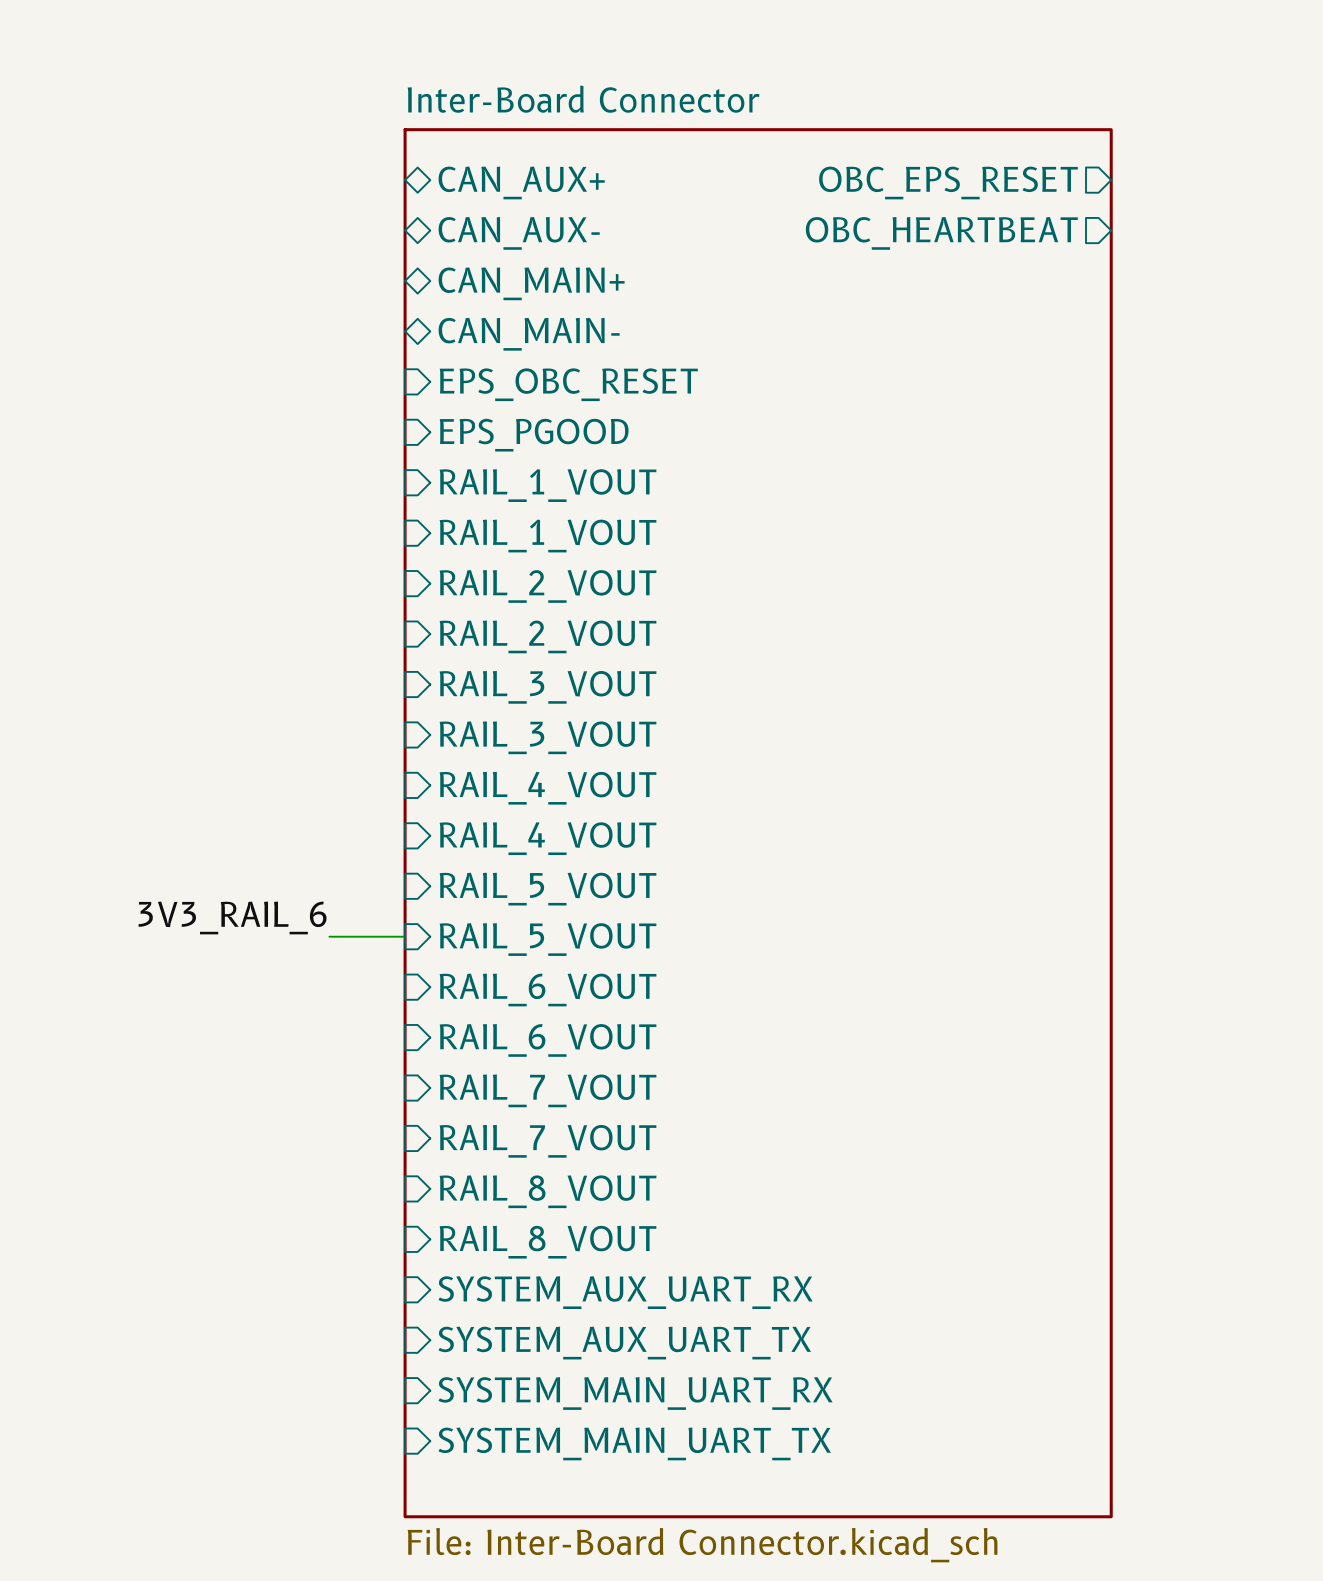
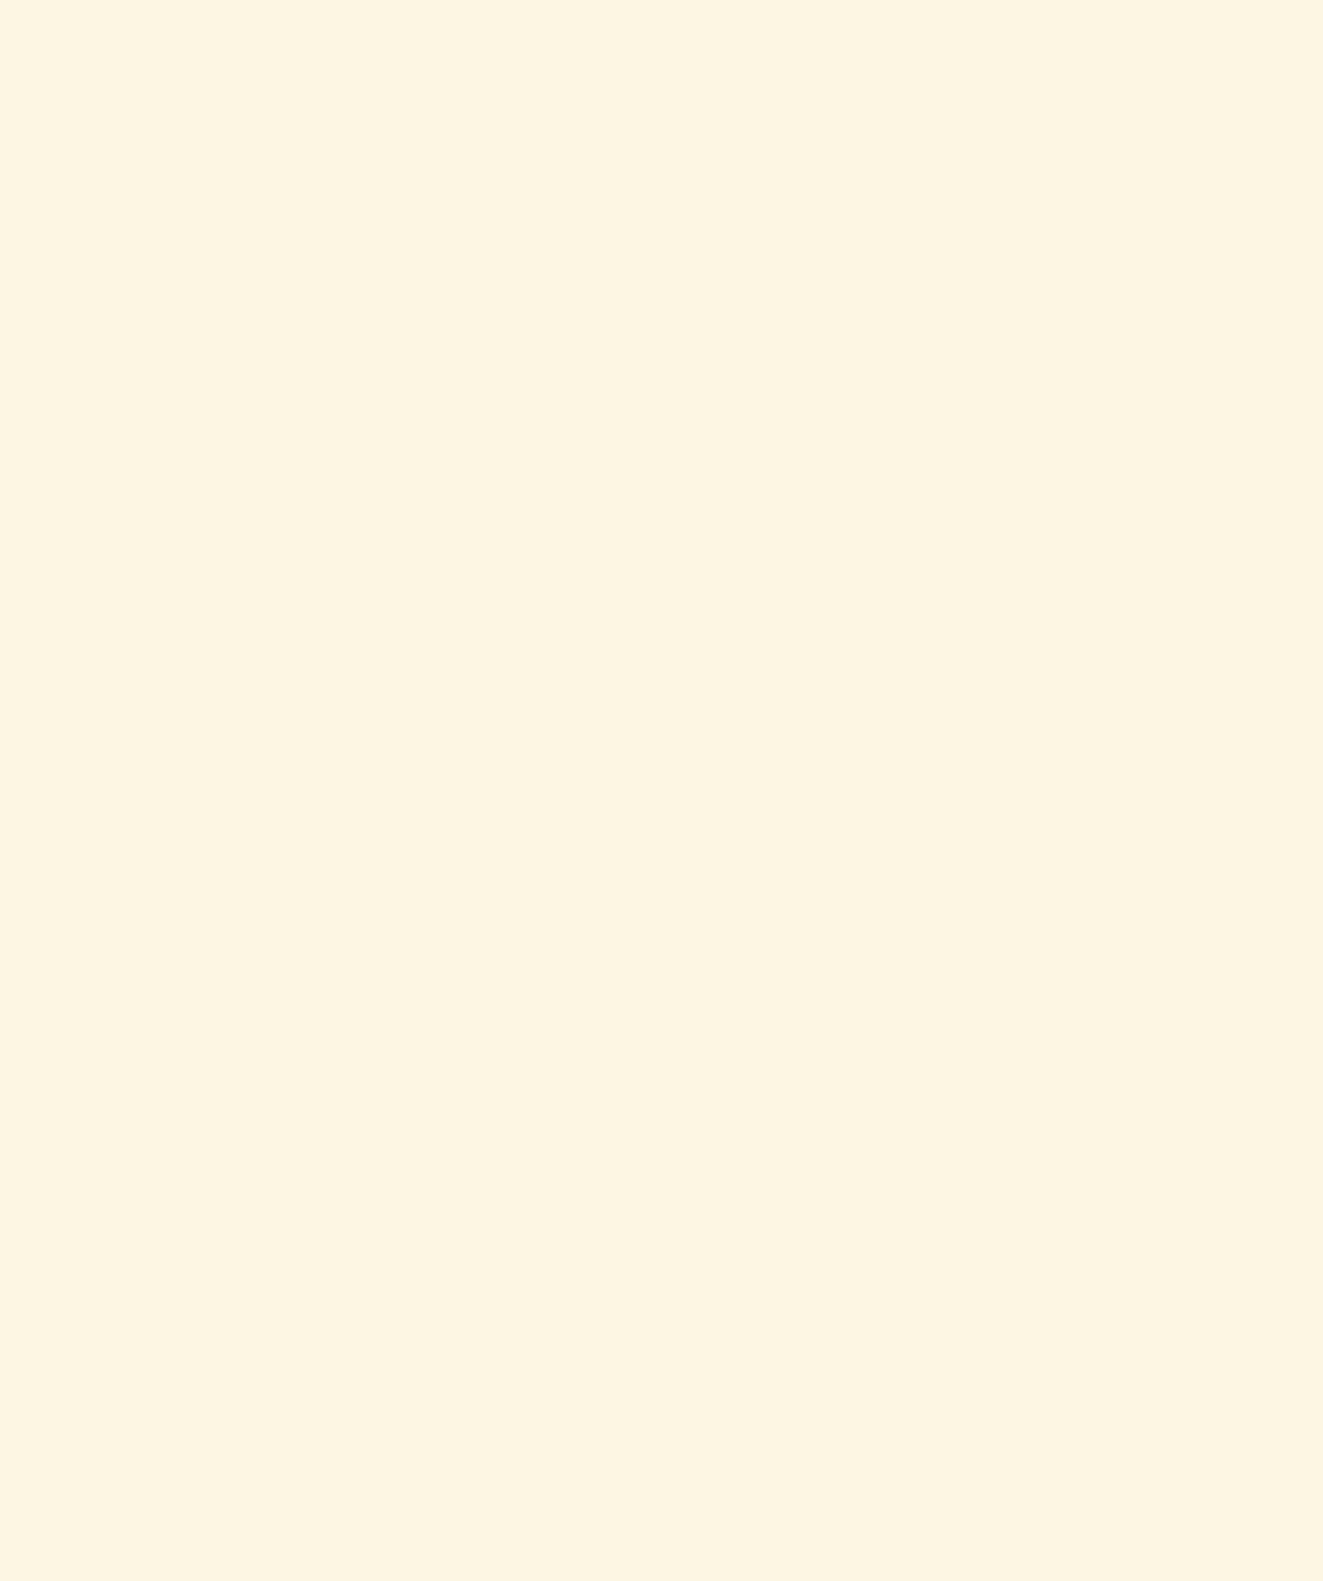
sheet pin: CAN_AUX+ (521, 182) -> none
sheet pin: OBC_EPS_RESET (948, 182) -> none
sheet pin: CAN_AUX- (519, 233) -> none
sheet pin: OBC_HEARTBEAT (941, 233) -> none
sheet pin: CAN_MAIN+ (531, 283) -> none
sheet pin: CAN_MAIN- (529, 334) -> none
sheet pin: EPS_OBC_RESET (568, 384) -> none
sheet pin: EPS_PGOOD (534, 435) -> none
sheet pin: RAIL_1_VOUT (548, 485) -> none
sheet pin: RAIL_1_VOUT (548, 536) -> none
sheet pin: RAIL_2_VOUT (548, 586) -> none
sheet pin: RAIL_2_VOUT (548, 636) -> none
sheet pin: RAIL_3_VOUT (548, 687) -> none
sheet pin: RAIL_3_VOUT (548, 737) -> none
sheet pin: RAIL_4_VOUT (548, 788) -> none
sheet Inter-Board Connector: File: Inter-Board Connector.kicad_sch (758, 823) -> none
sheet pin: RAIL_4_VOUT (548, 838) -> none
sheet pin: RAIL_5_VOUT (548, 889) -> none
label: 3V3_RAIL_6 (232, 917) -> none
wire: (329, 936) (405, 936) -> none
sheet pin: RAIL_5_VOUT (548, 939) -> none
sheet pin: RAIL_6_VOUT (548, 989) -> none
sheet pin: RAIL_6_VOUT (548, 1040) -> none
sheet pin: RAIL_7_VOUT (548, 1090) -> none
sheet pin: RAIL_7_VOUT (548, 1141) -> none
sheet pin: RAIL_8_VOUT (548, 1191) -> none
sheet pin: RAIL_8_VOUT (548, 1242) -> none
sheet pin: SYSTEM_AUX_UART_RX (625, 1292) -> none
sheet pin: SYSTEM_AUX_UART_TX (624, 1343) -> none
sheet pin: SYSTEM_MAIN_UART_RX (635, 1393) -> none
sheet pin: SYSTEM_MAIN_UART_TX (634, 1443) -> none

